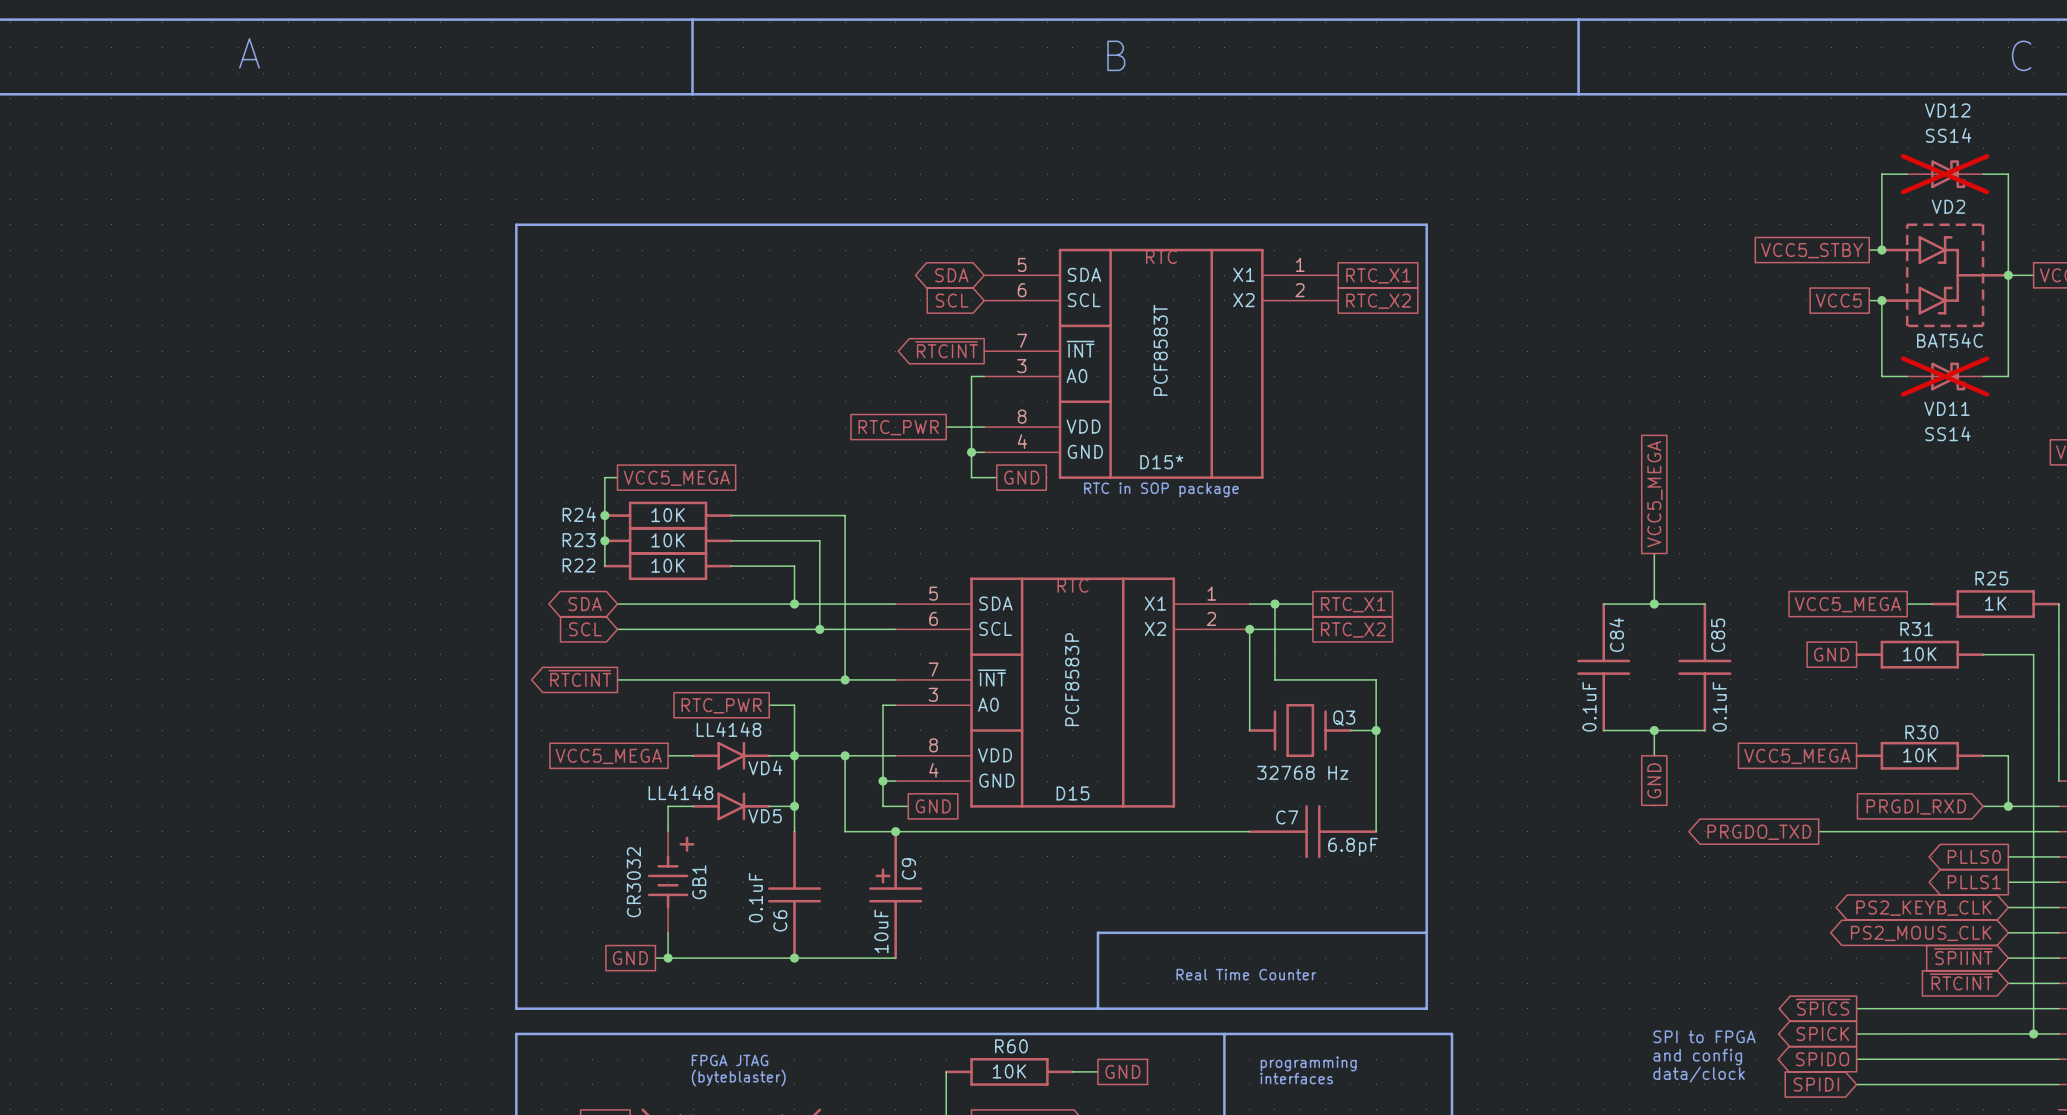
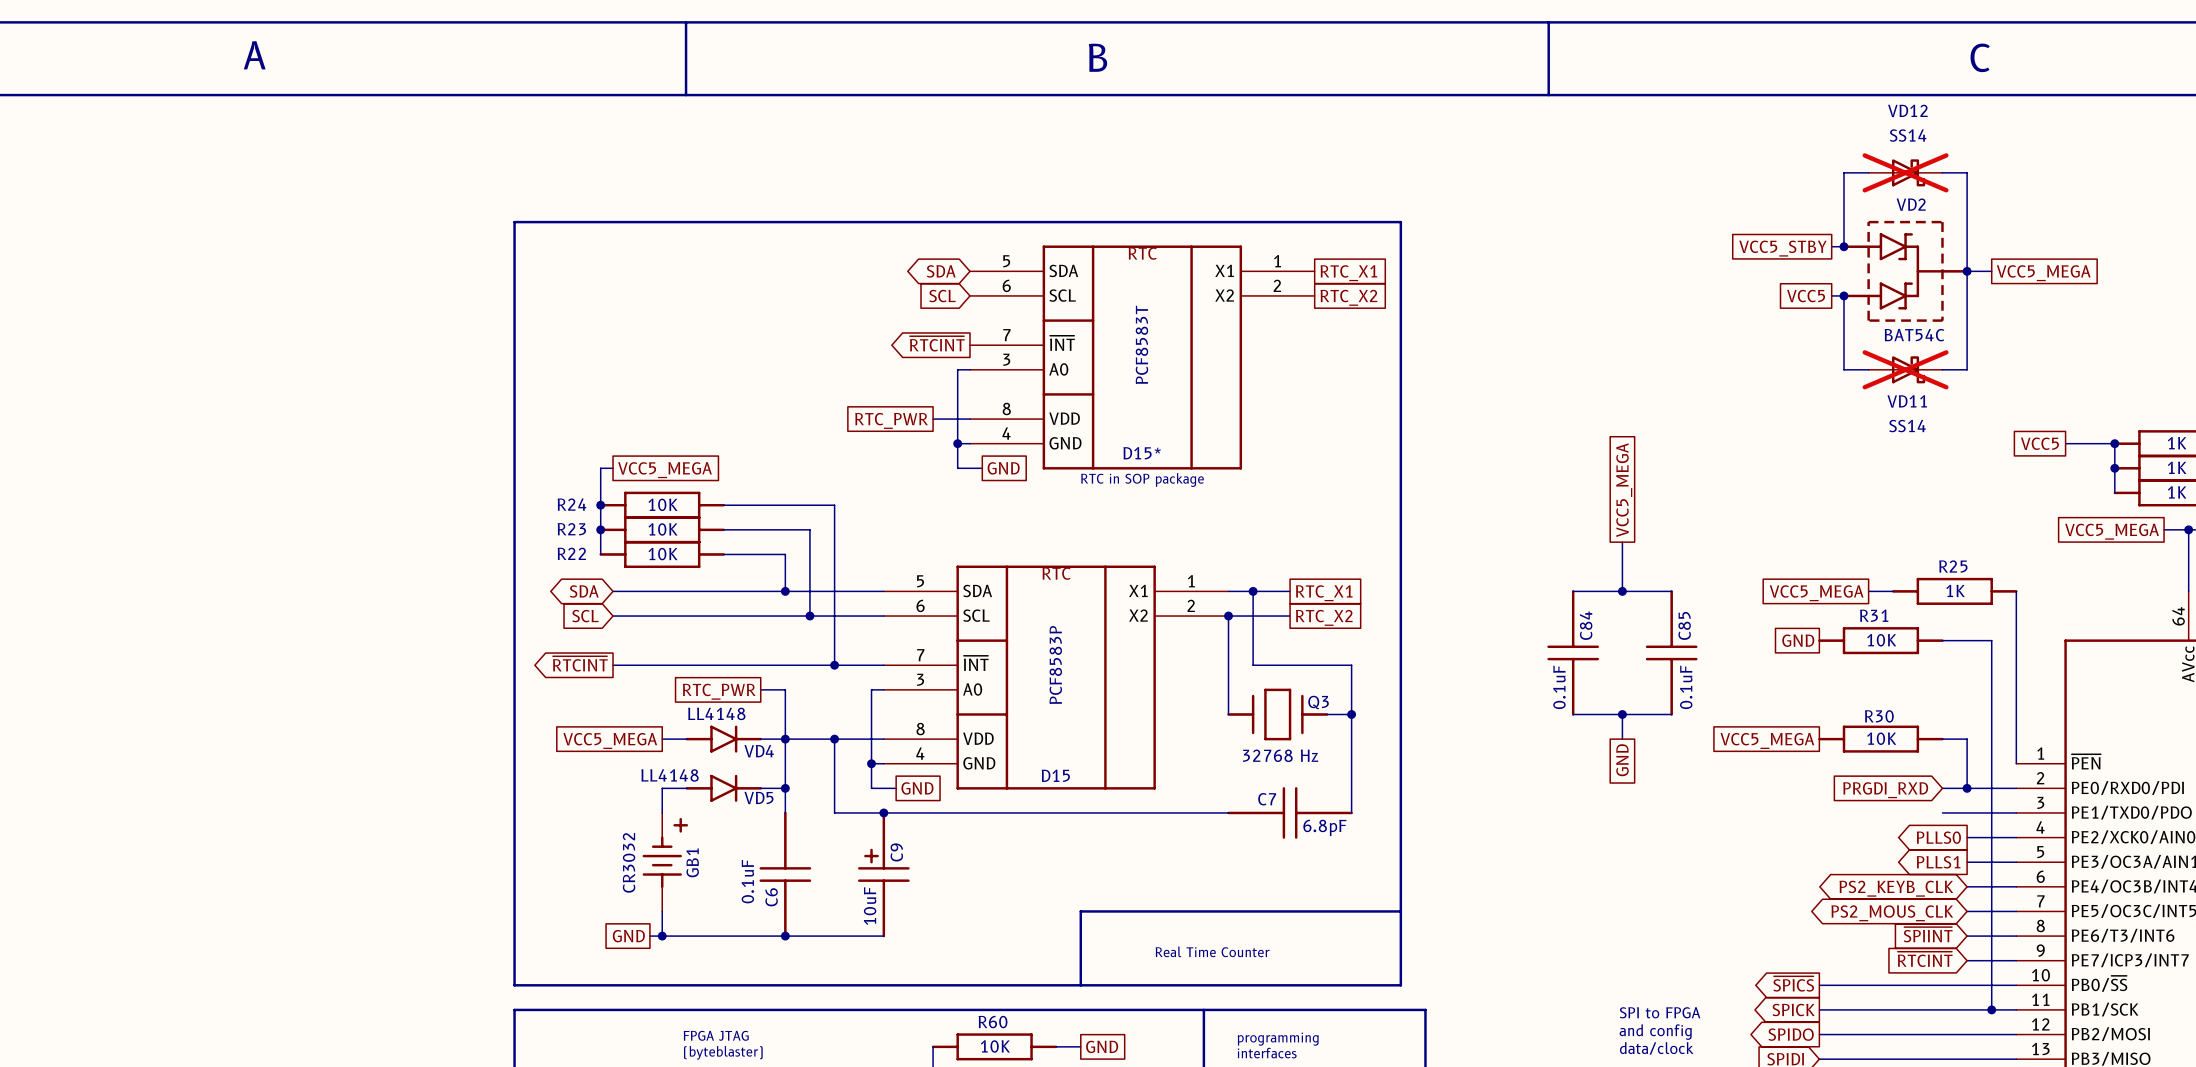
wire: (1818, 831) (1983, 831) -> none
global label: PRGDO_TXD (1759, 832) -> none

